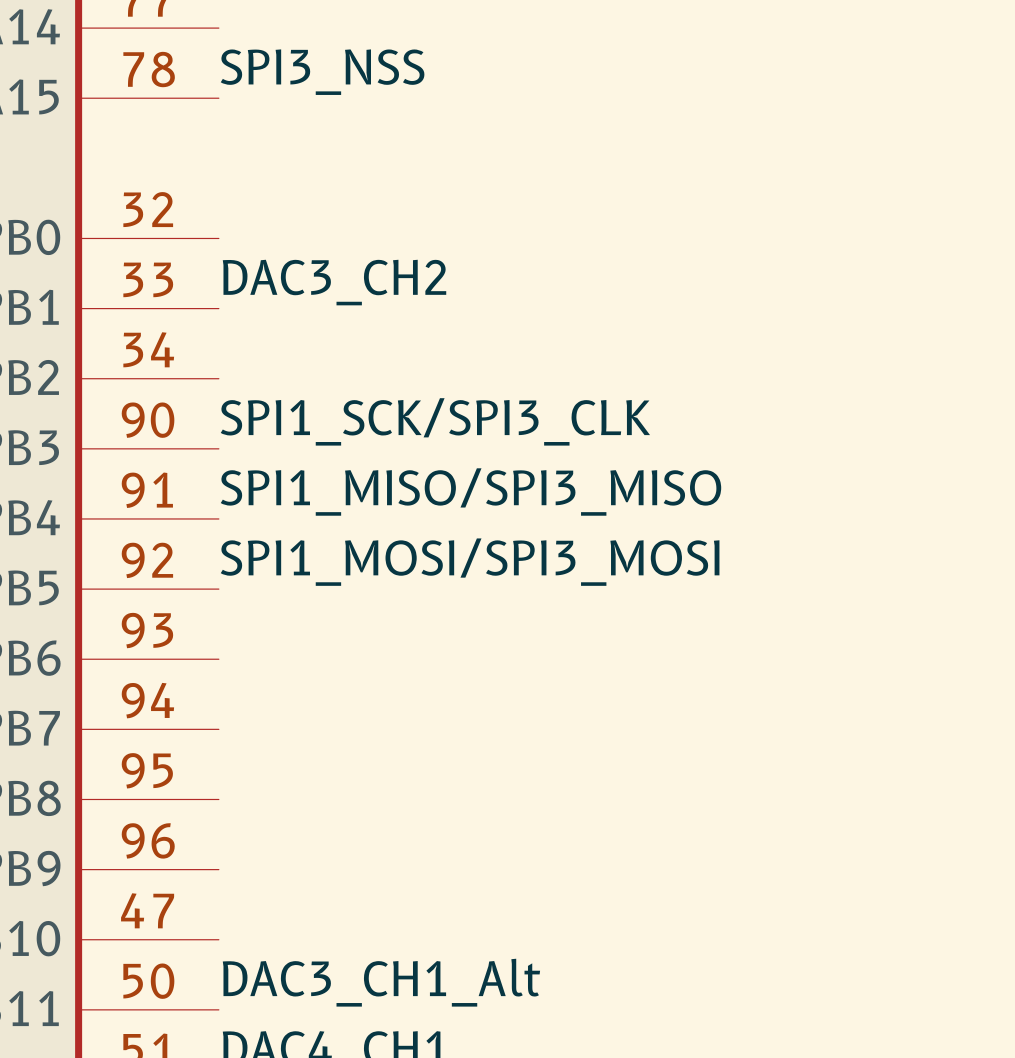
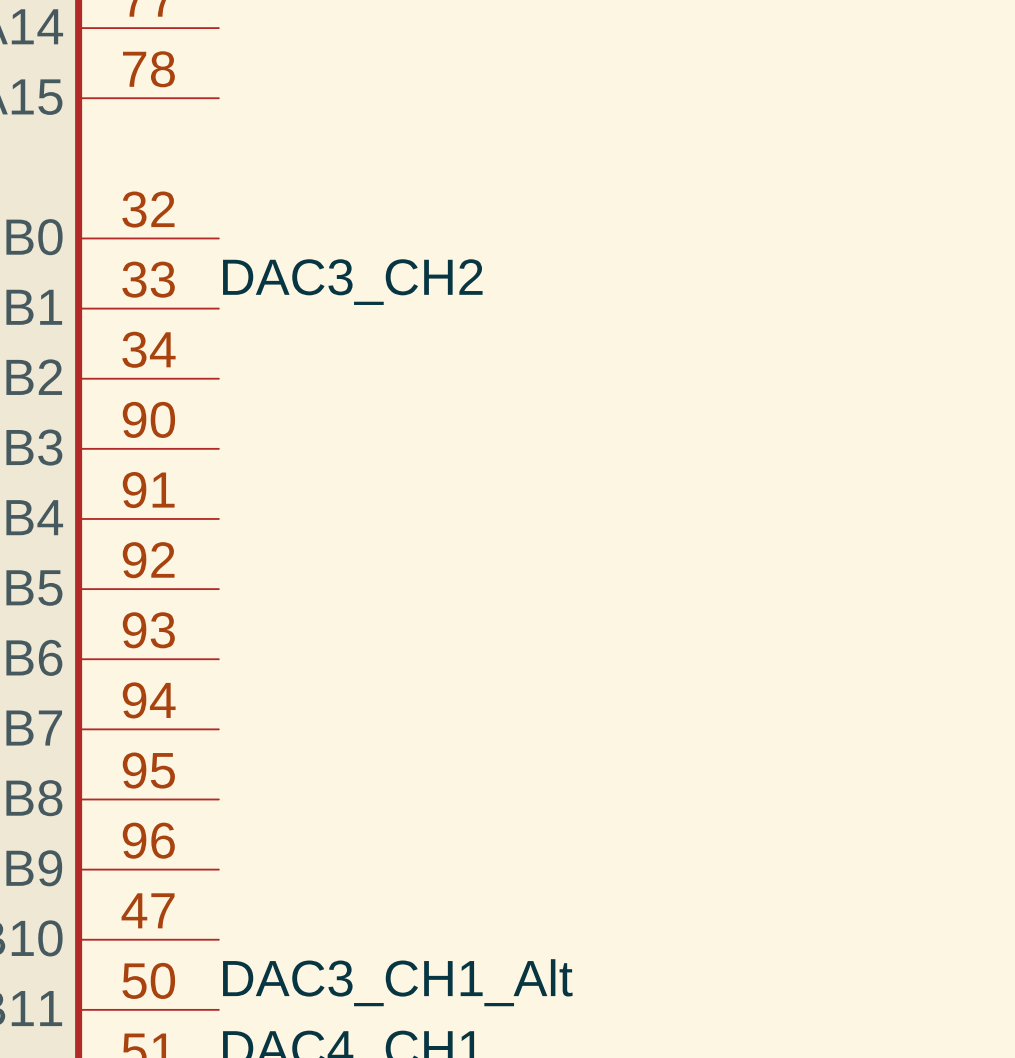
label: SPI3_NSS (322, 72) -> none
label: SPI1_SCK/SPI3_CLK (435, 421) -> none
label: SPI1_MISO/SPI3_MISO (470, 492) -> none
label: SPI1_MOSI/SPI3_MOSI (470, 562) -> none

